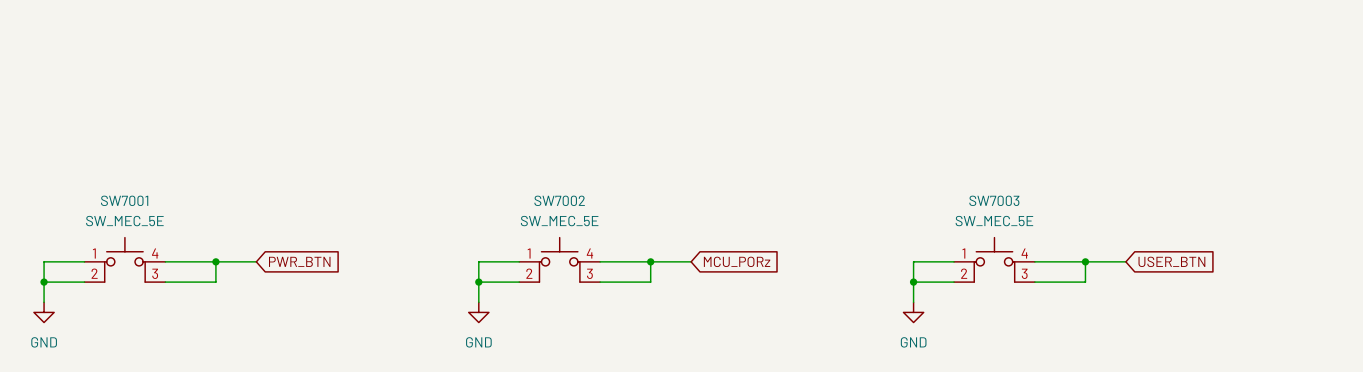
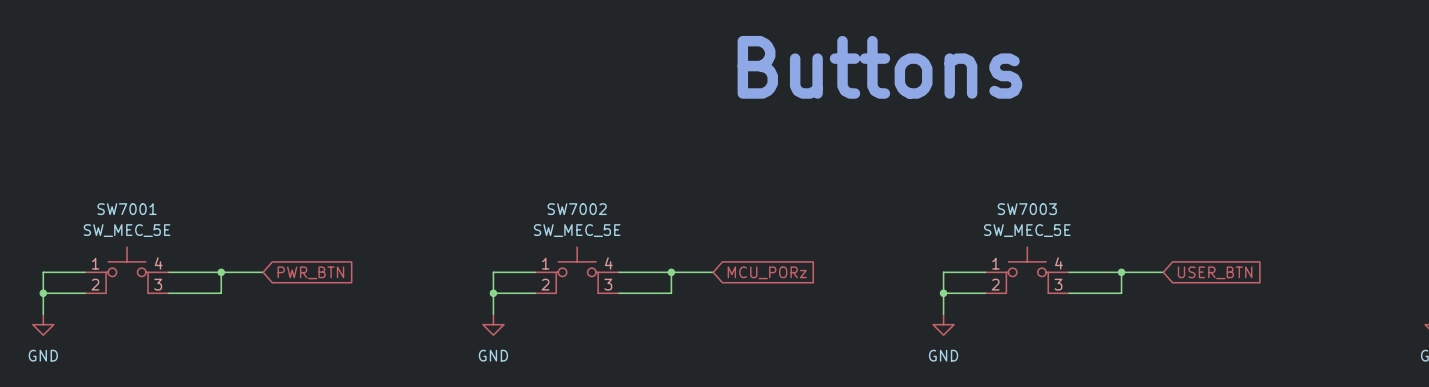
text: none -> Buttons (879, 67)

